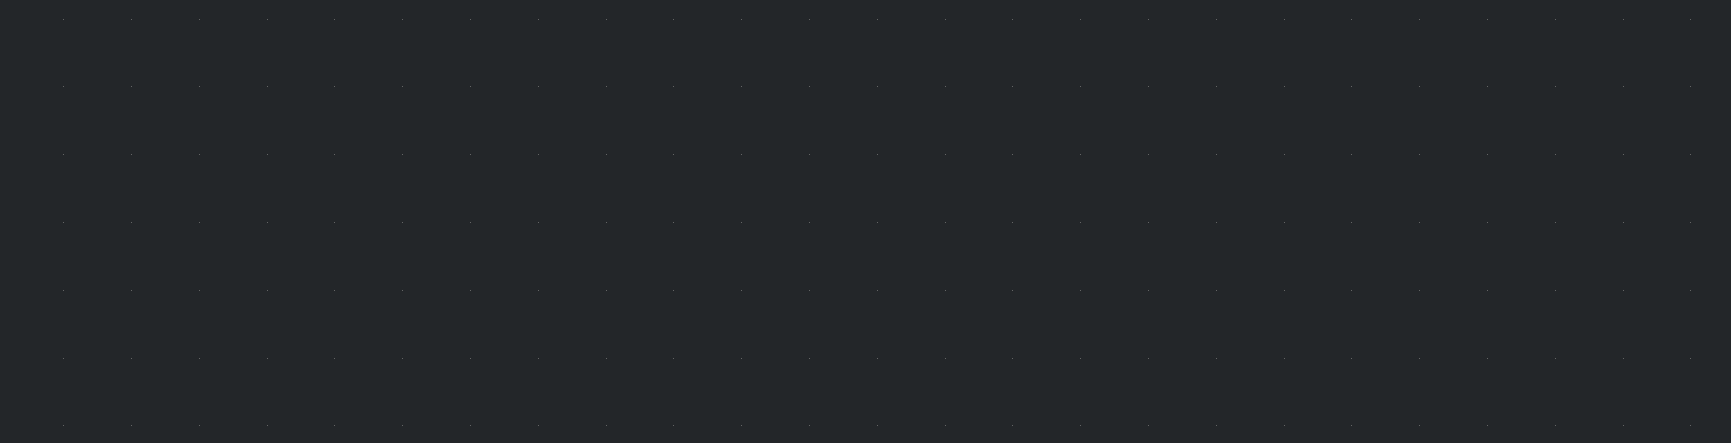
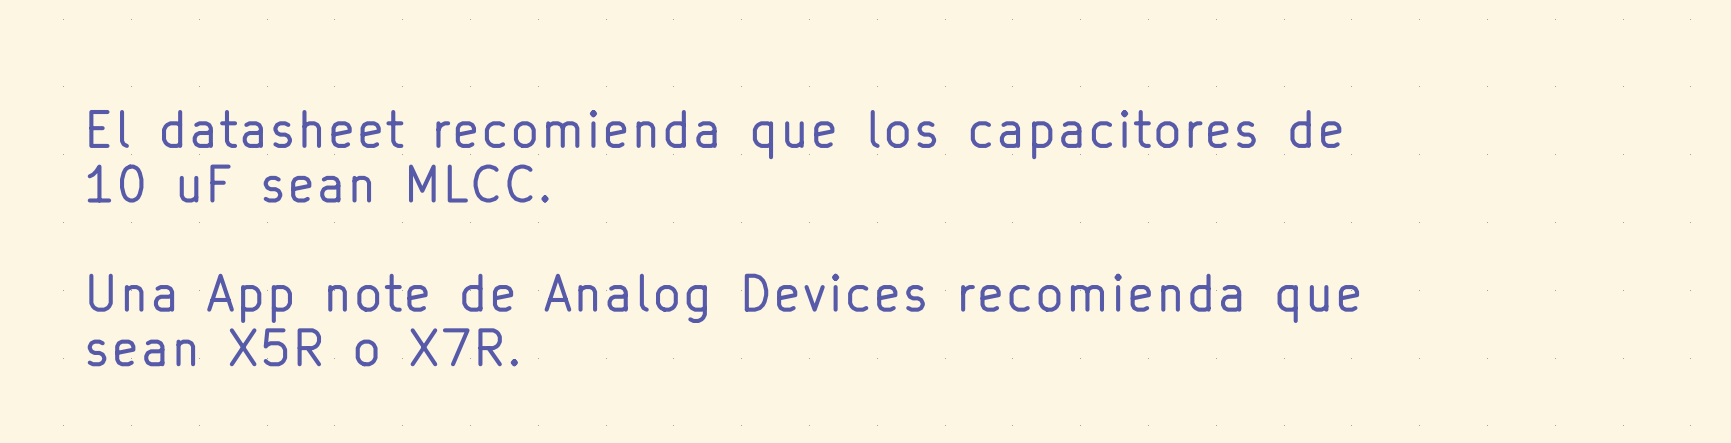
text: none -> El datasheet recomienda que los capacitores de (715, 134)
text: none -> 10 uF sean MLCC. (318, 183)
text: none -> Una App note de Analog Devices recomienda que (724, 298)
text: none -> sean X5R o X7R. (302, 347)

